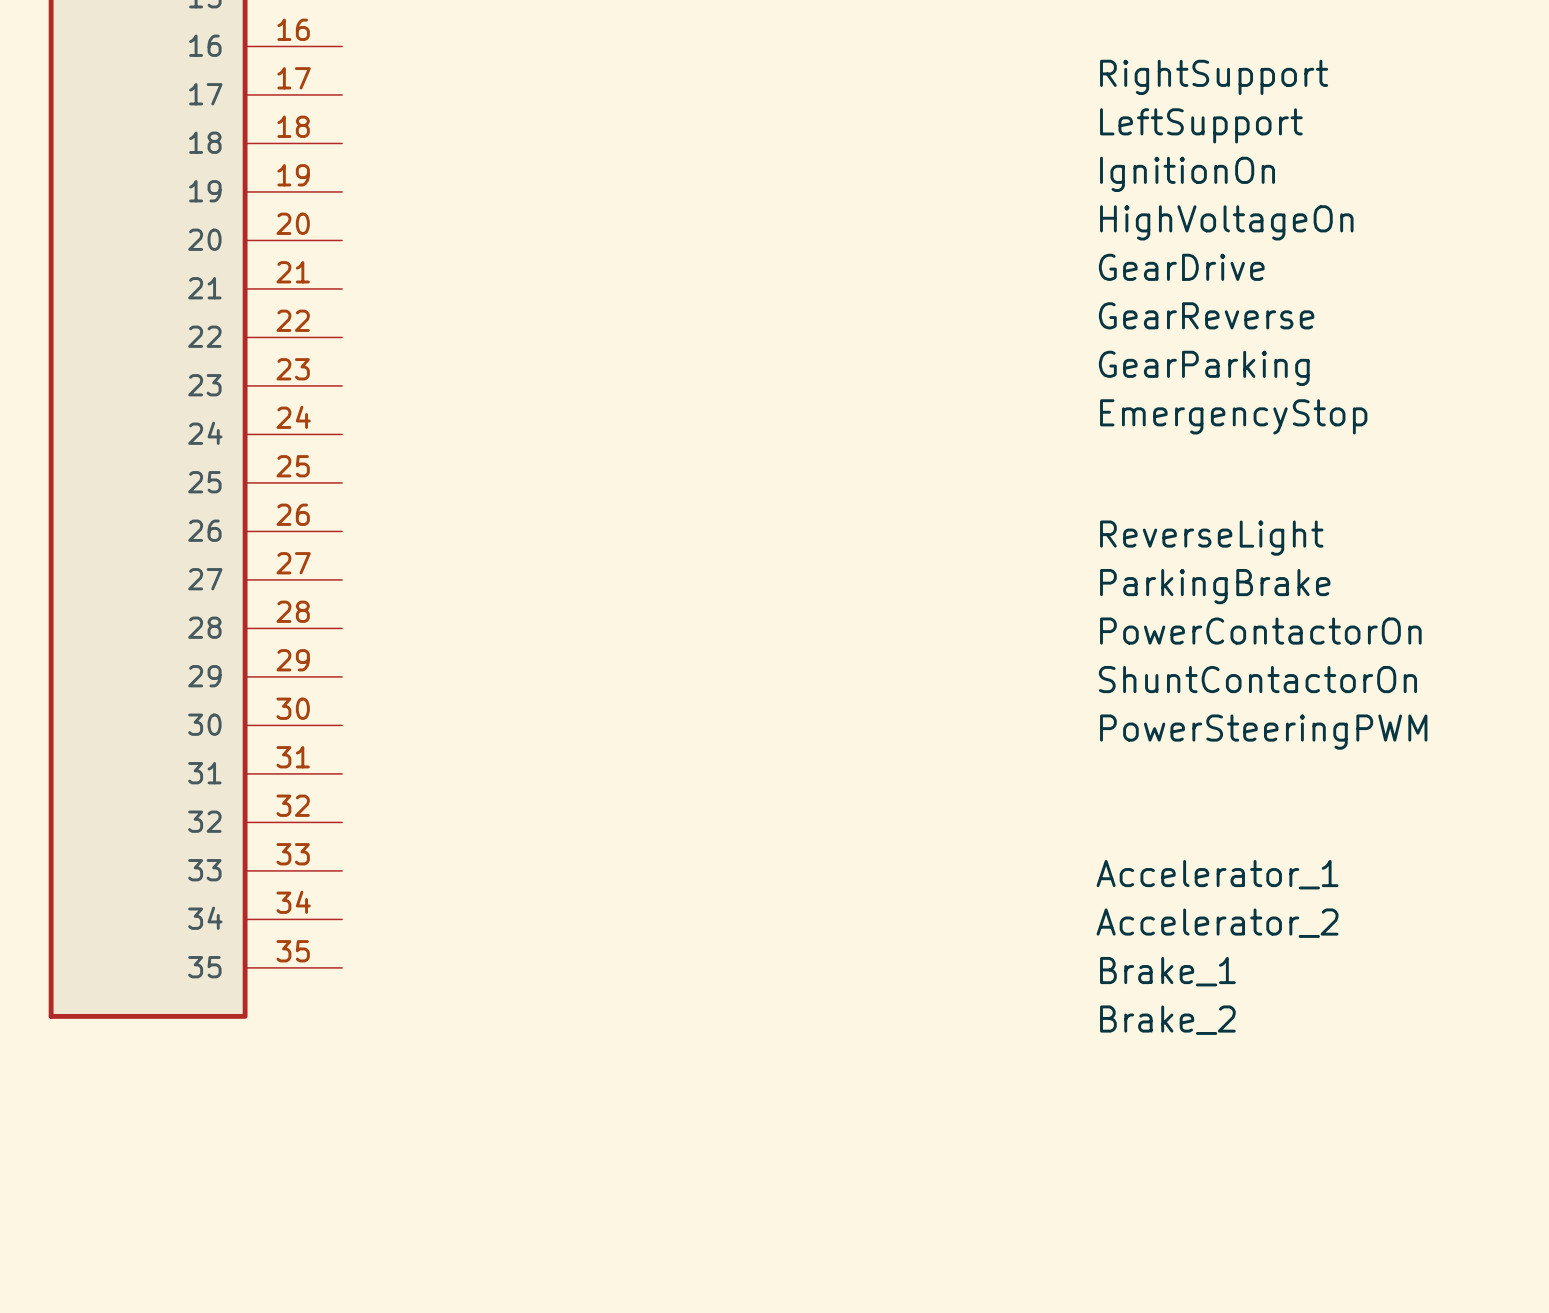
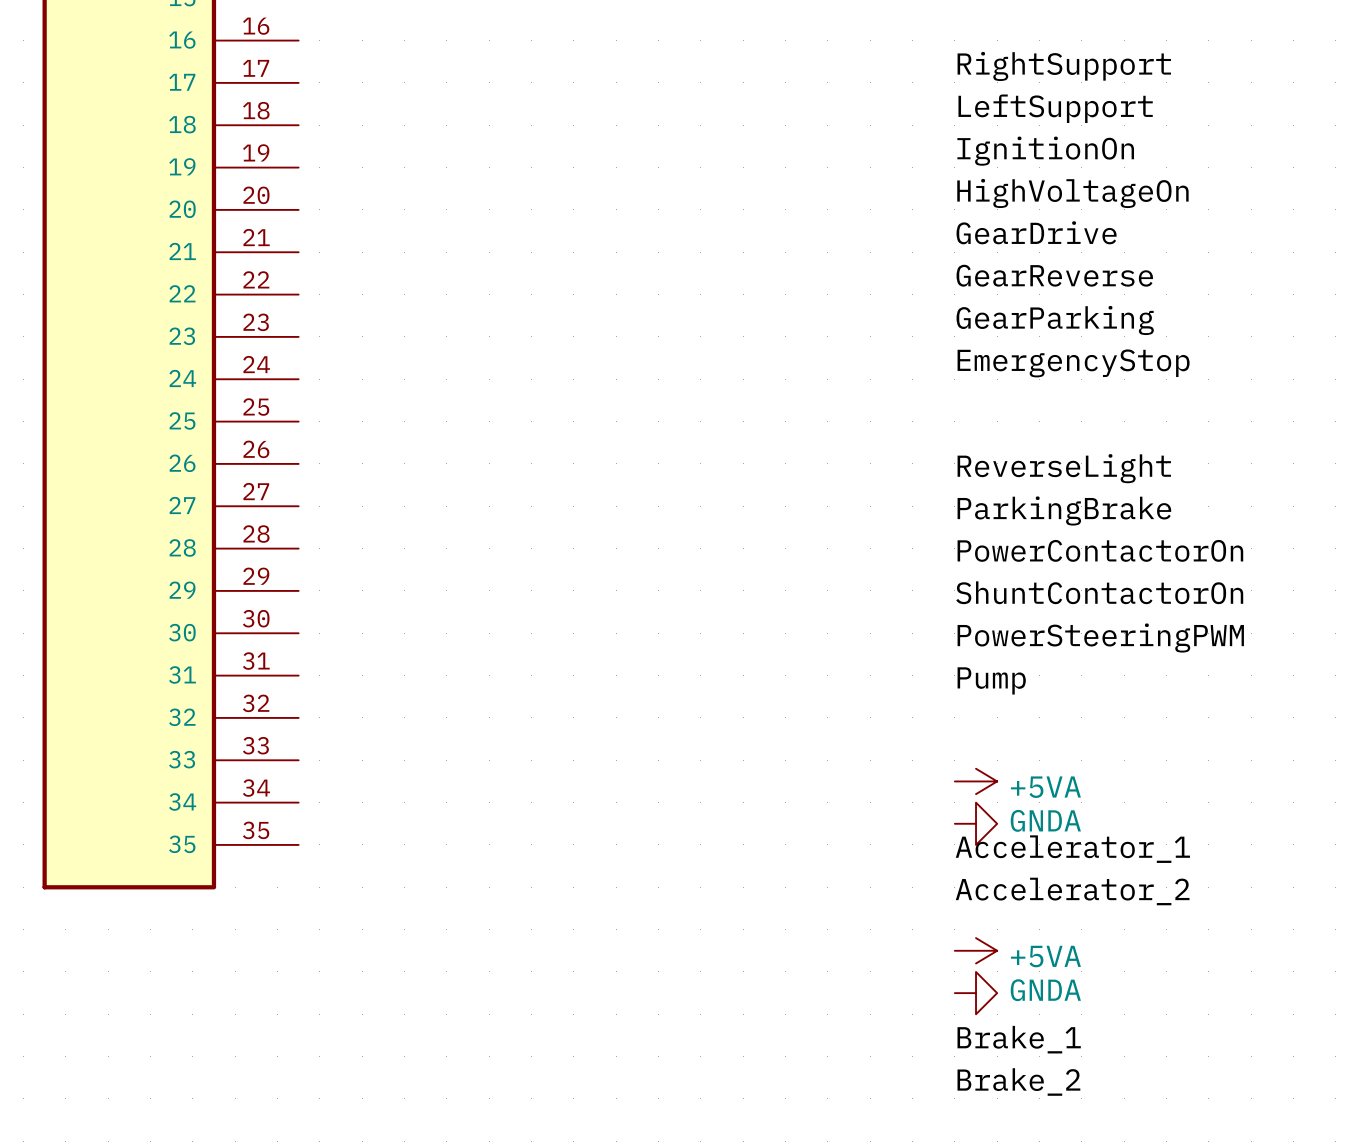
label: none -> Pump (991, 680)
label: Accelerator_1 (1217, 874) -> none
power symbol: none -> +5VA (976, 781)
label: Accelerator_2 (1217, 923) -> none
power symbol: none -> GNDA (976, 823)
label: Brake_1 (1167, 971) -> Accelerator_1 (1072, 849)
label: Brake_2 (1167, 1020) -> Accelerator_2 (1072, 891)
power symbol: none -> +5VA (976, 950)
power symbol: none -> GNDA (976, 993)
label: none -> Brake_1 (1019, 1039)
label: none -> Brake_2 (1018, 1082)

